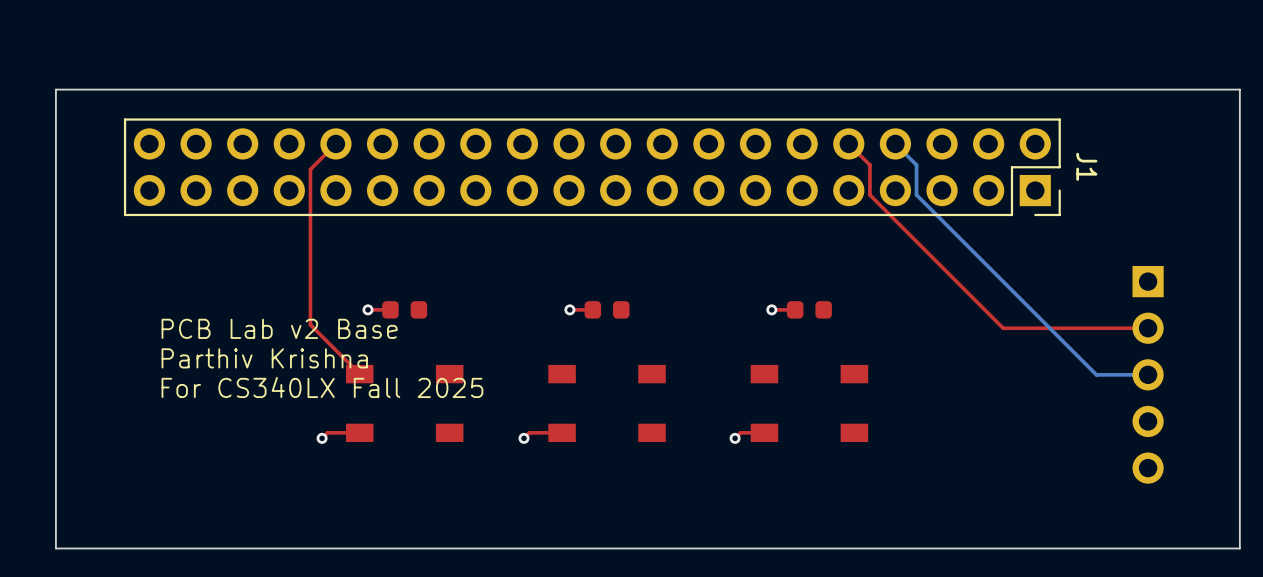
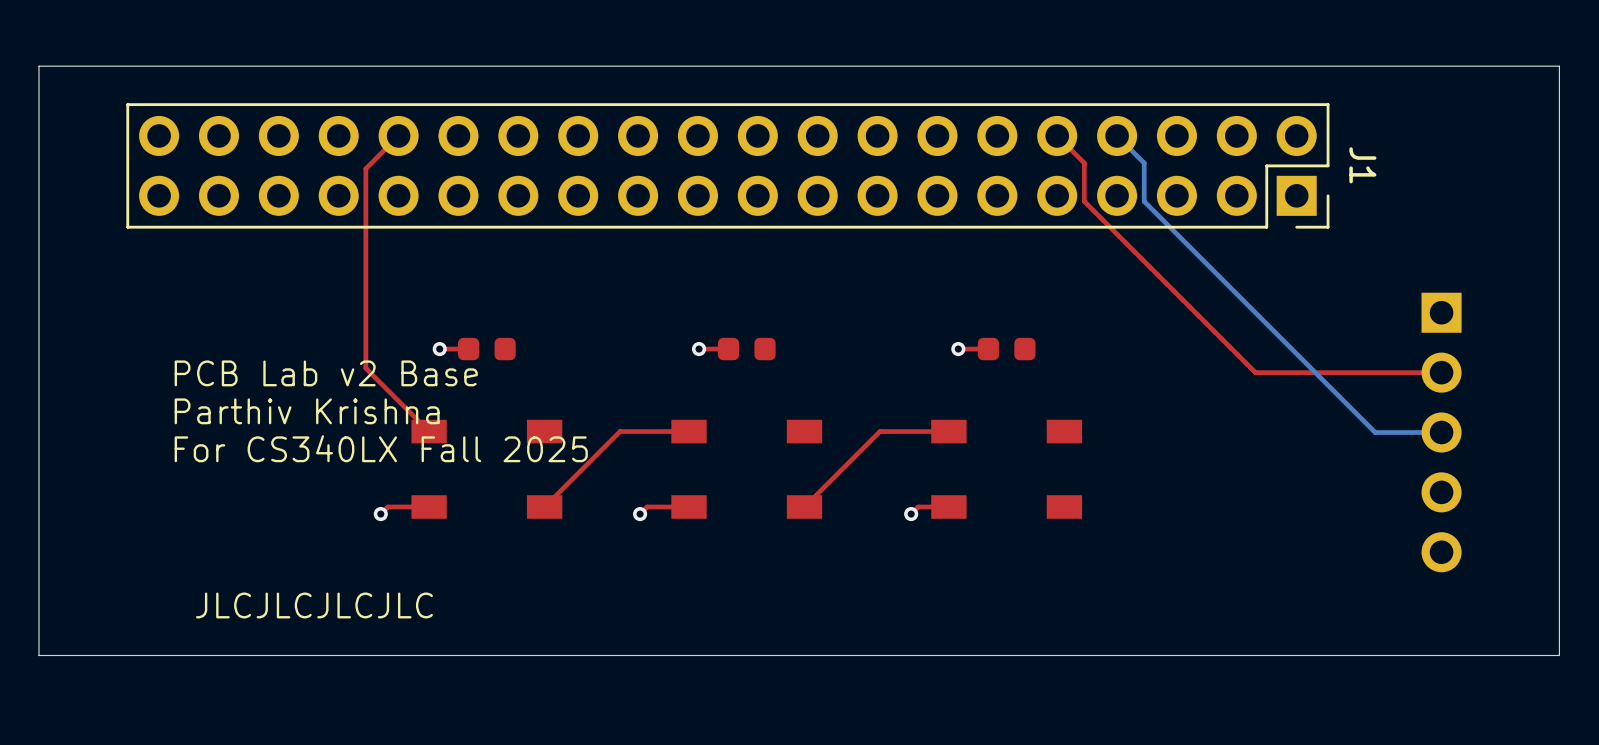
top track: none -> (689, 431) (620, 431) (544, 506)
top track: none -> (948, 431) (879, 431) (804, 506)
text: none -> JLCJLCJLCJLC (314, 605)

